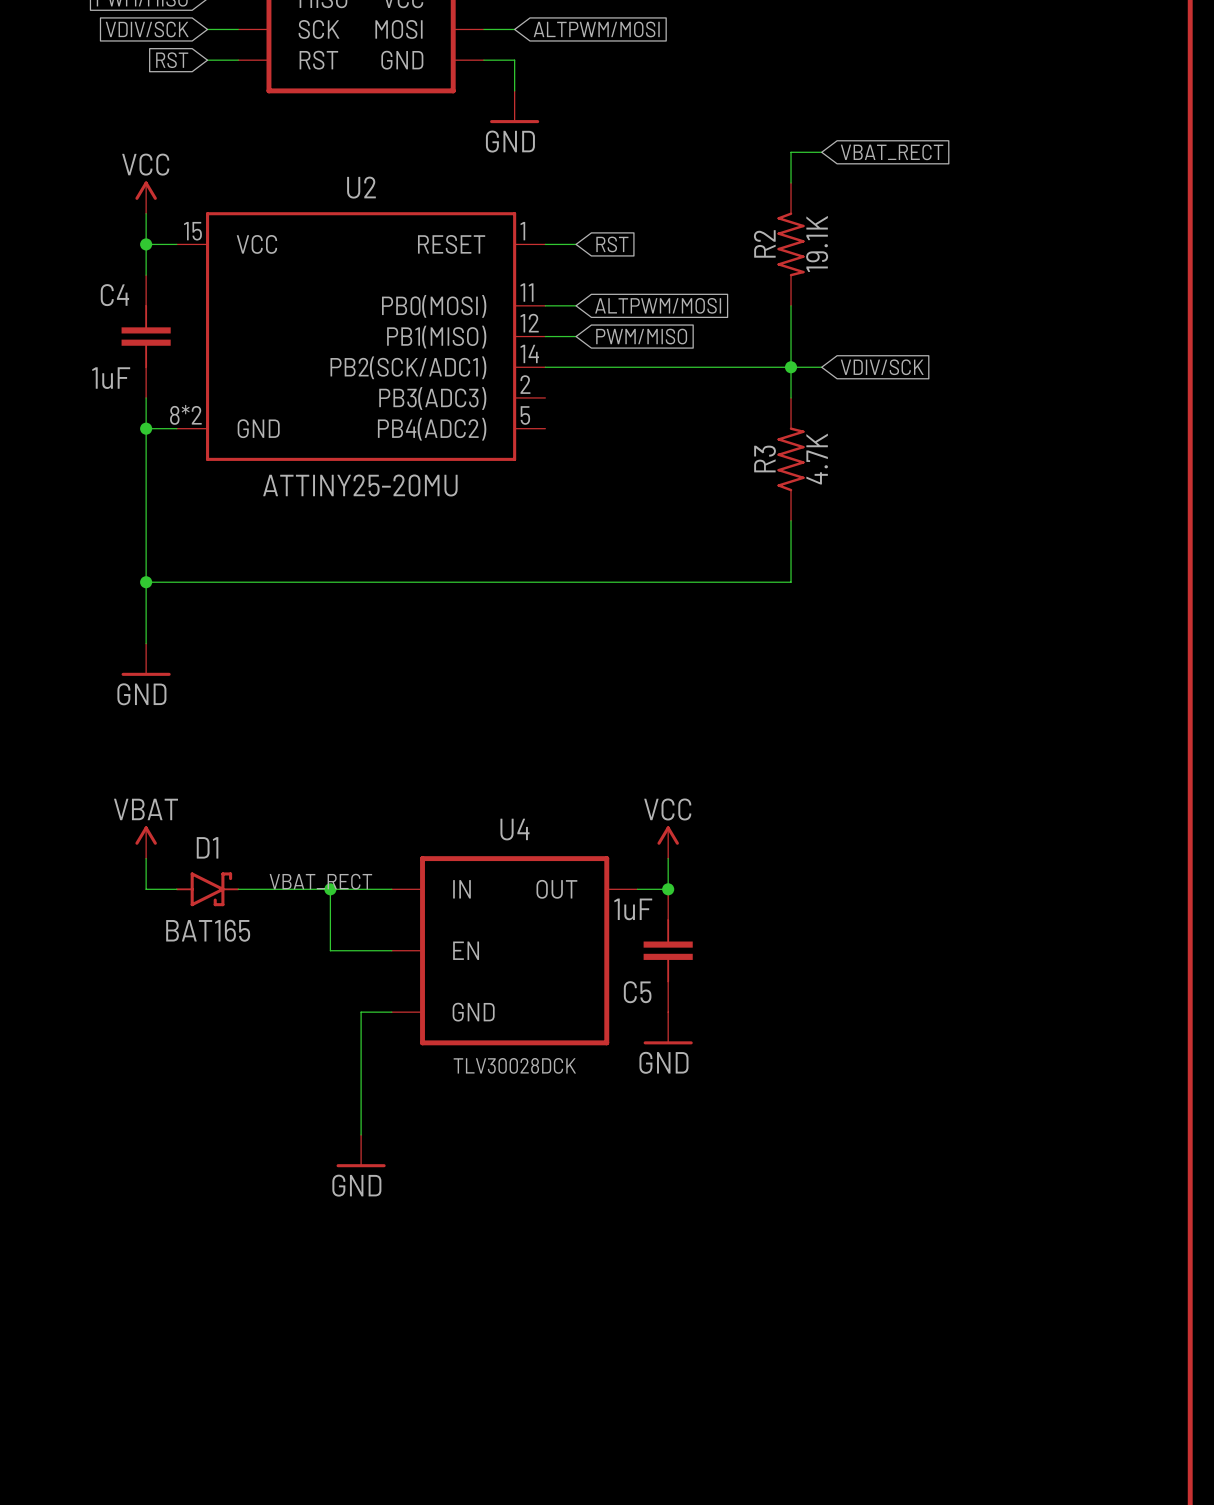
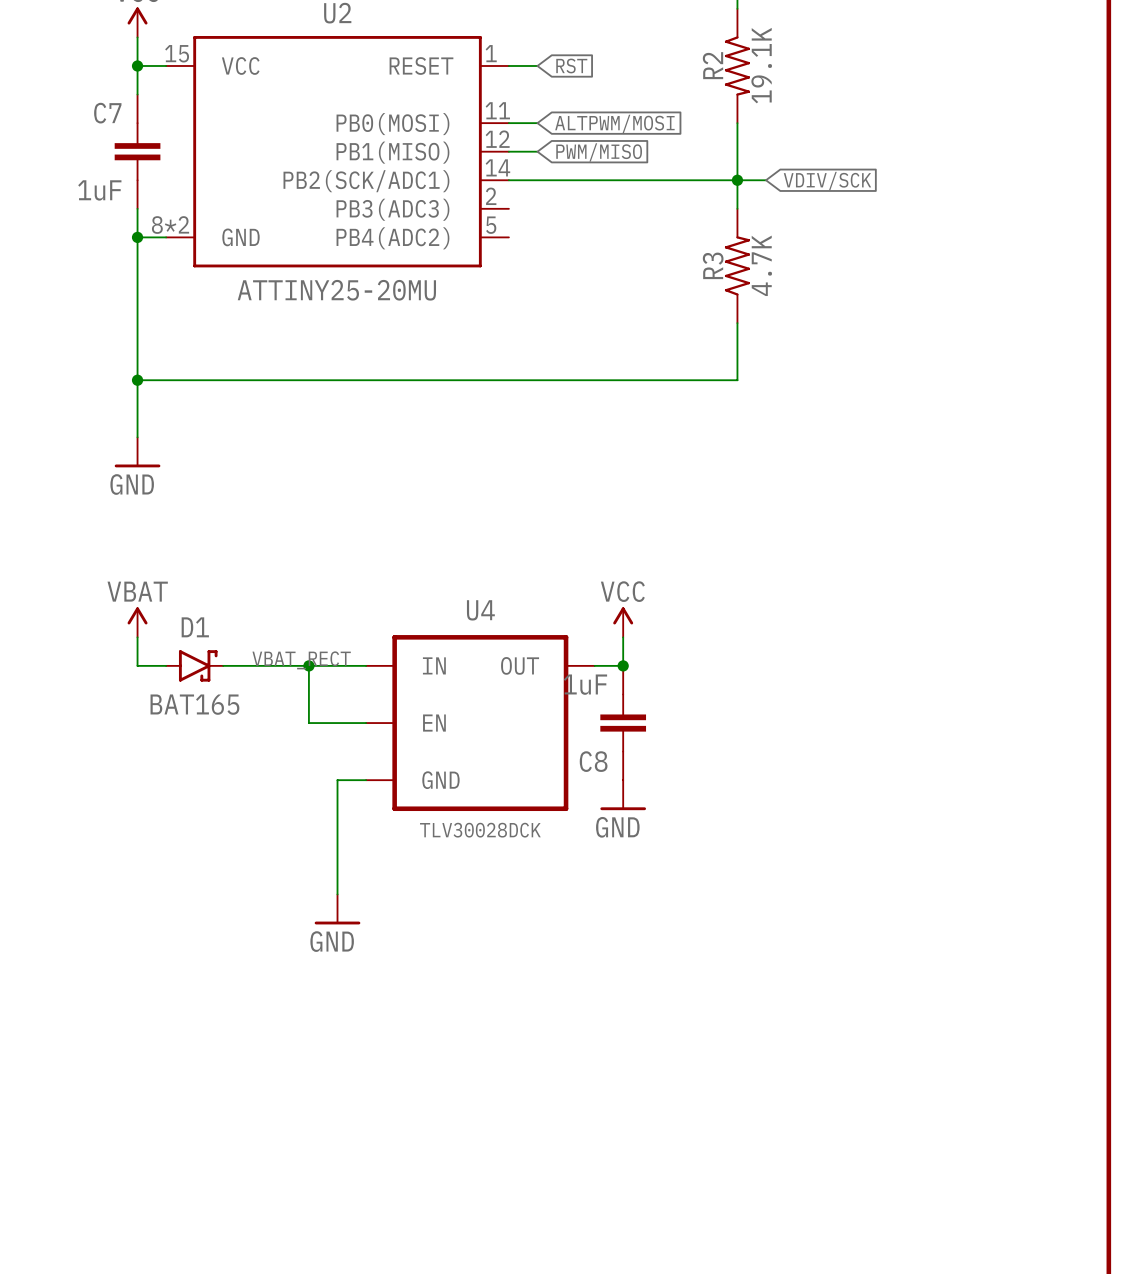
C4 name: C4 (114, 295) -> C7 (107, 113)
C5 name: C5 (637, 992) -> C8 (593, 761)

